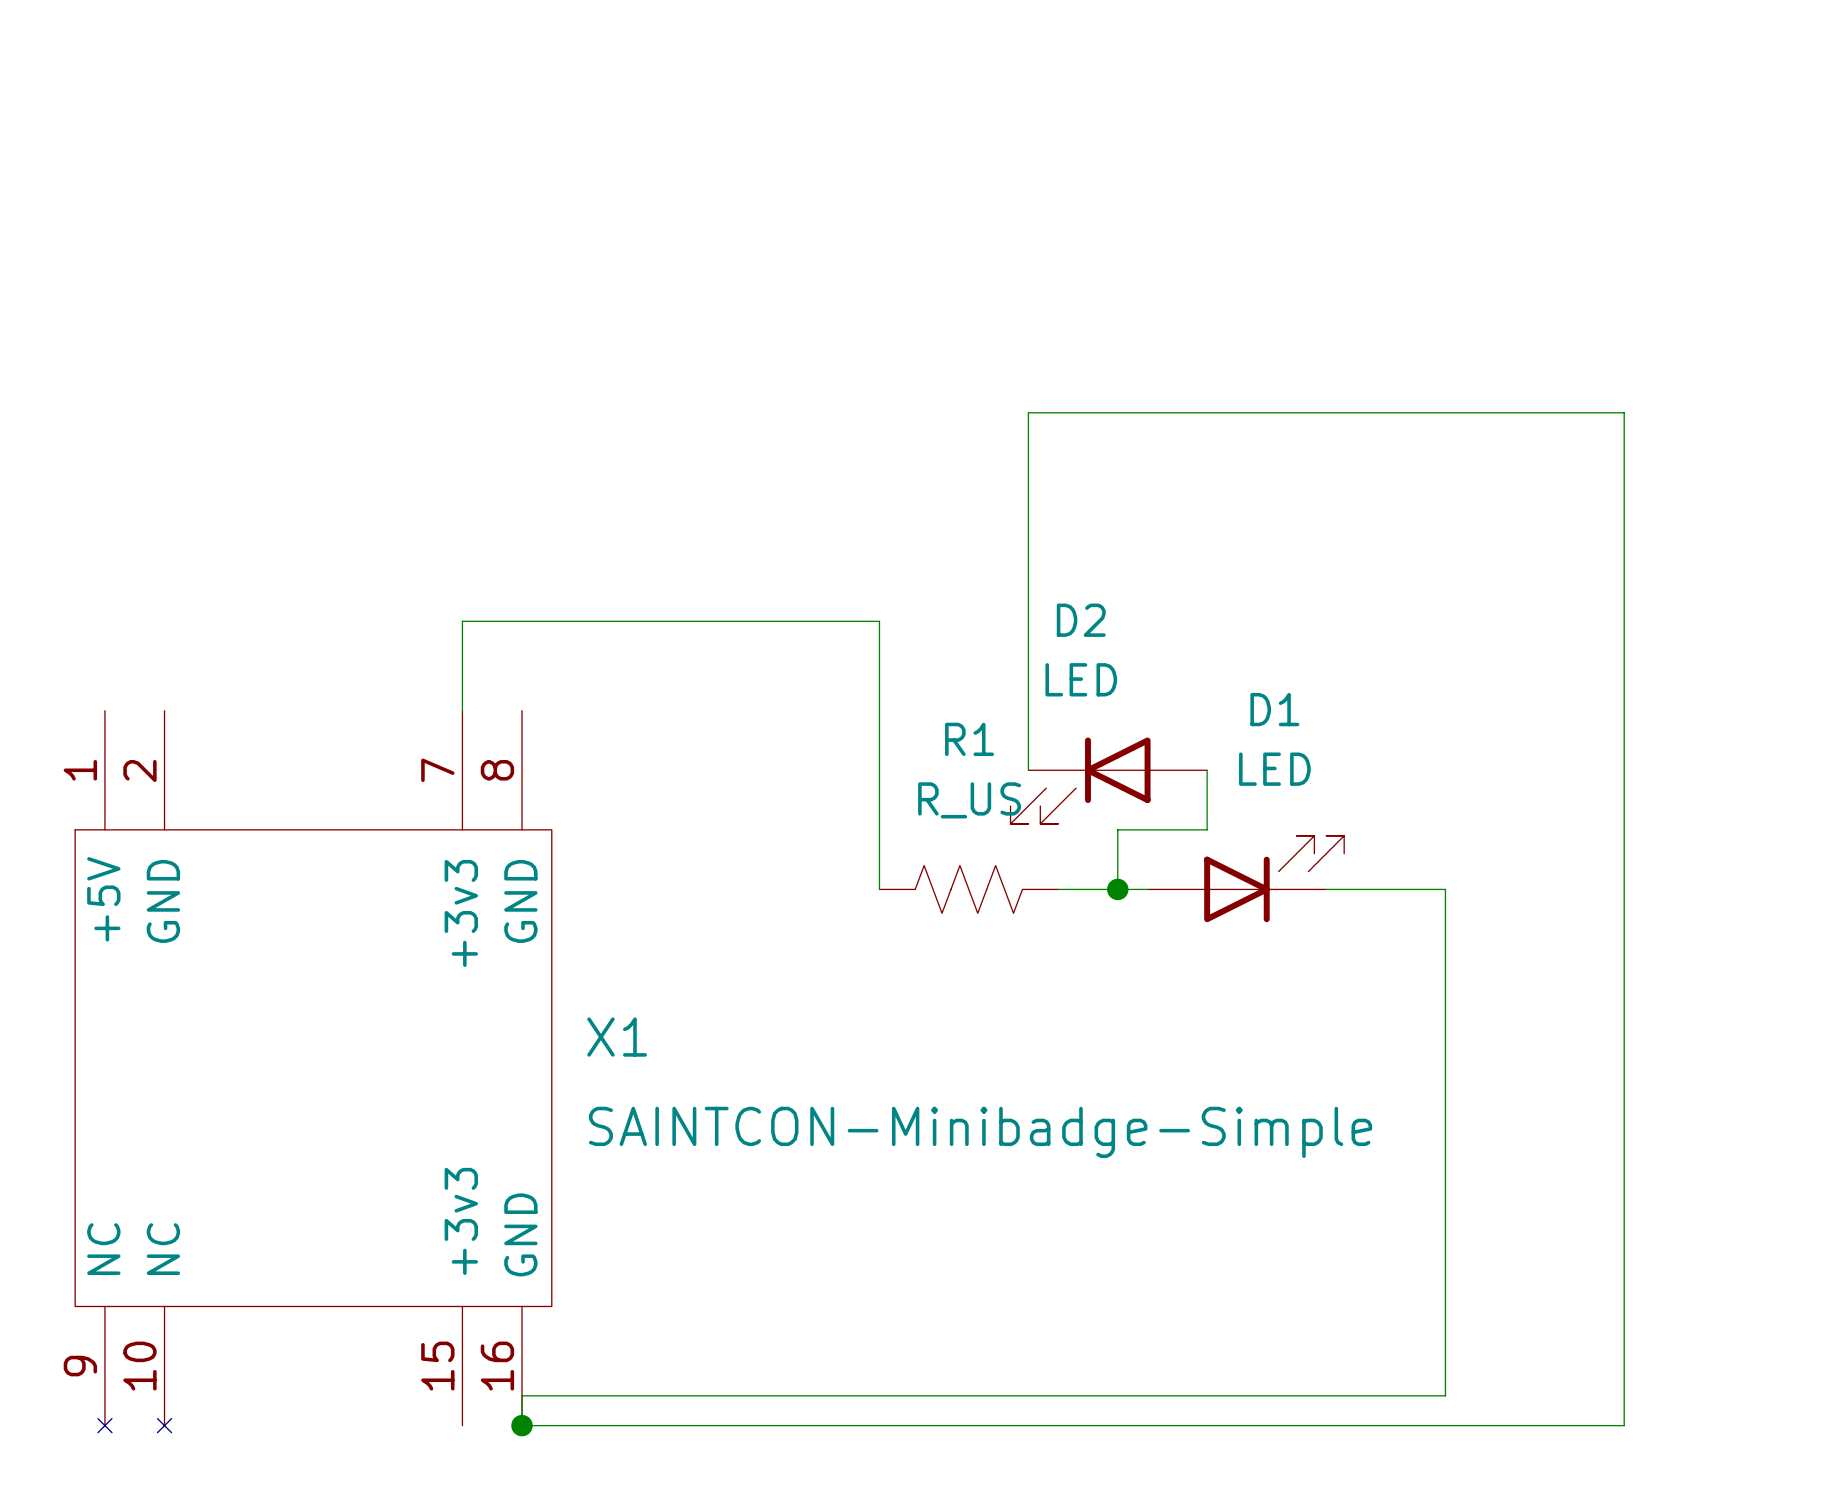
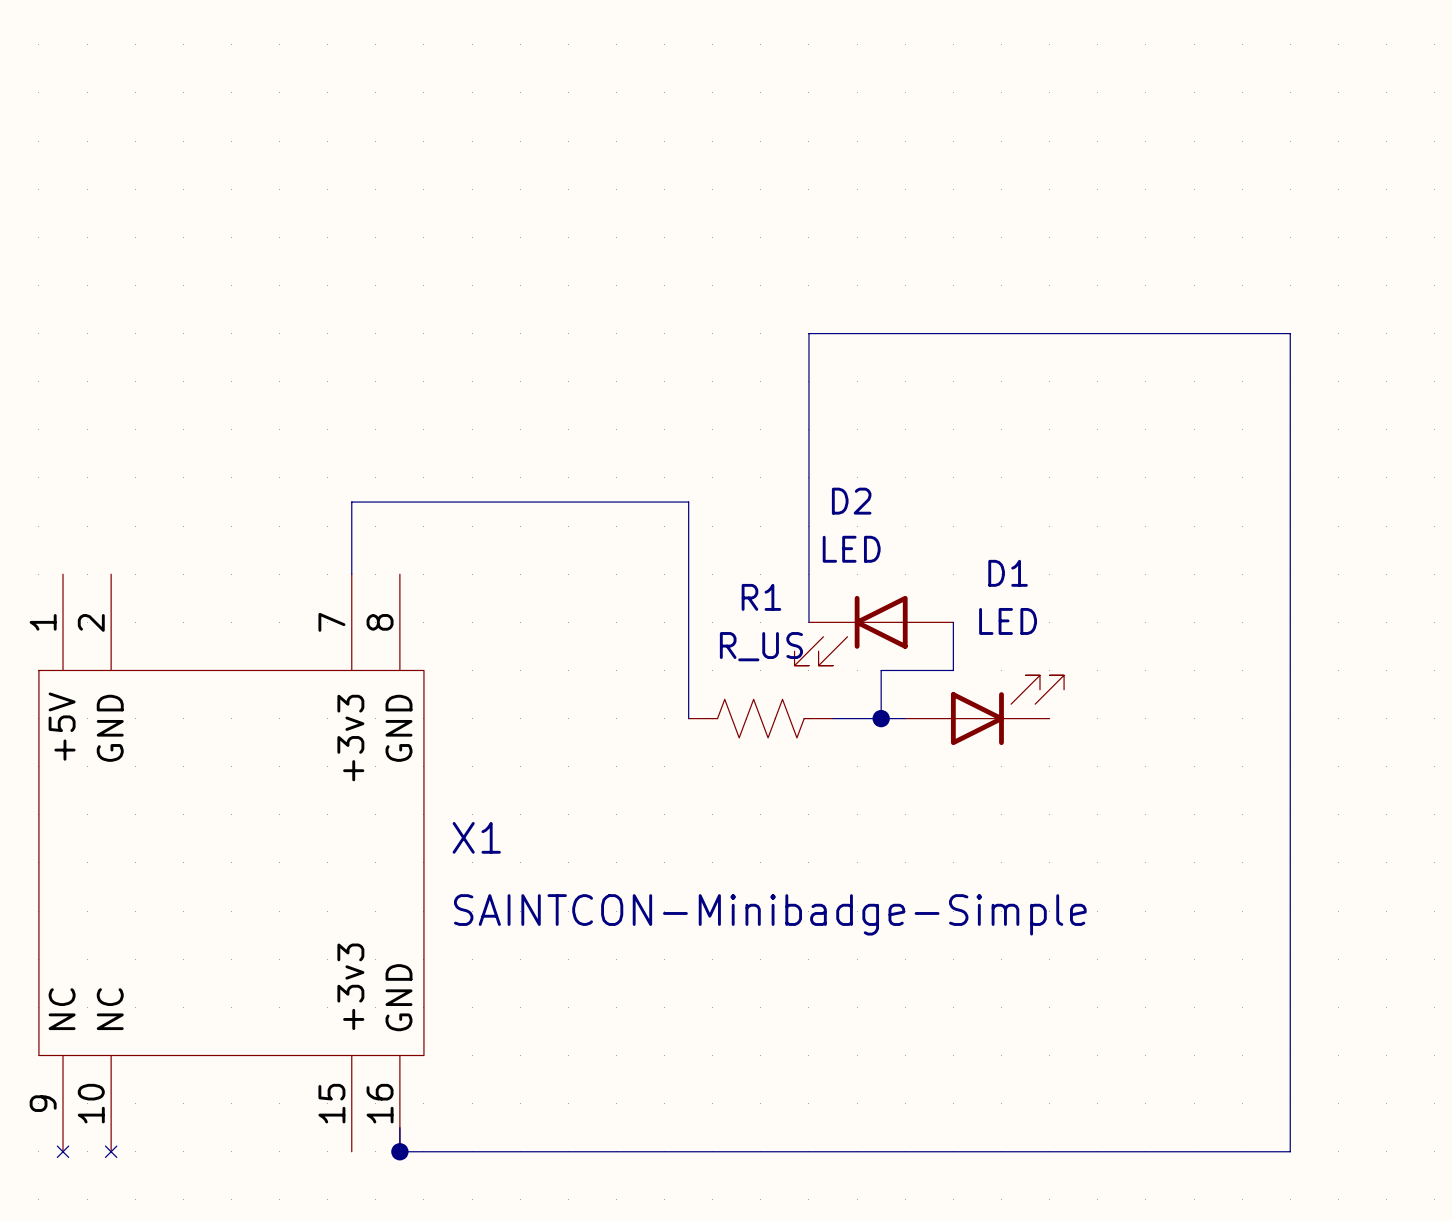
wire: (1326, 889) (1445, 889) (1445, 1395) (522, 1395) -> none

